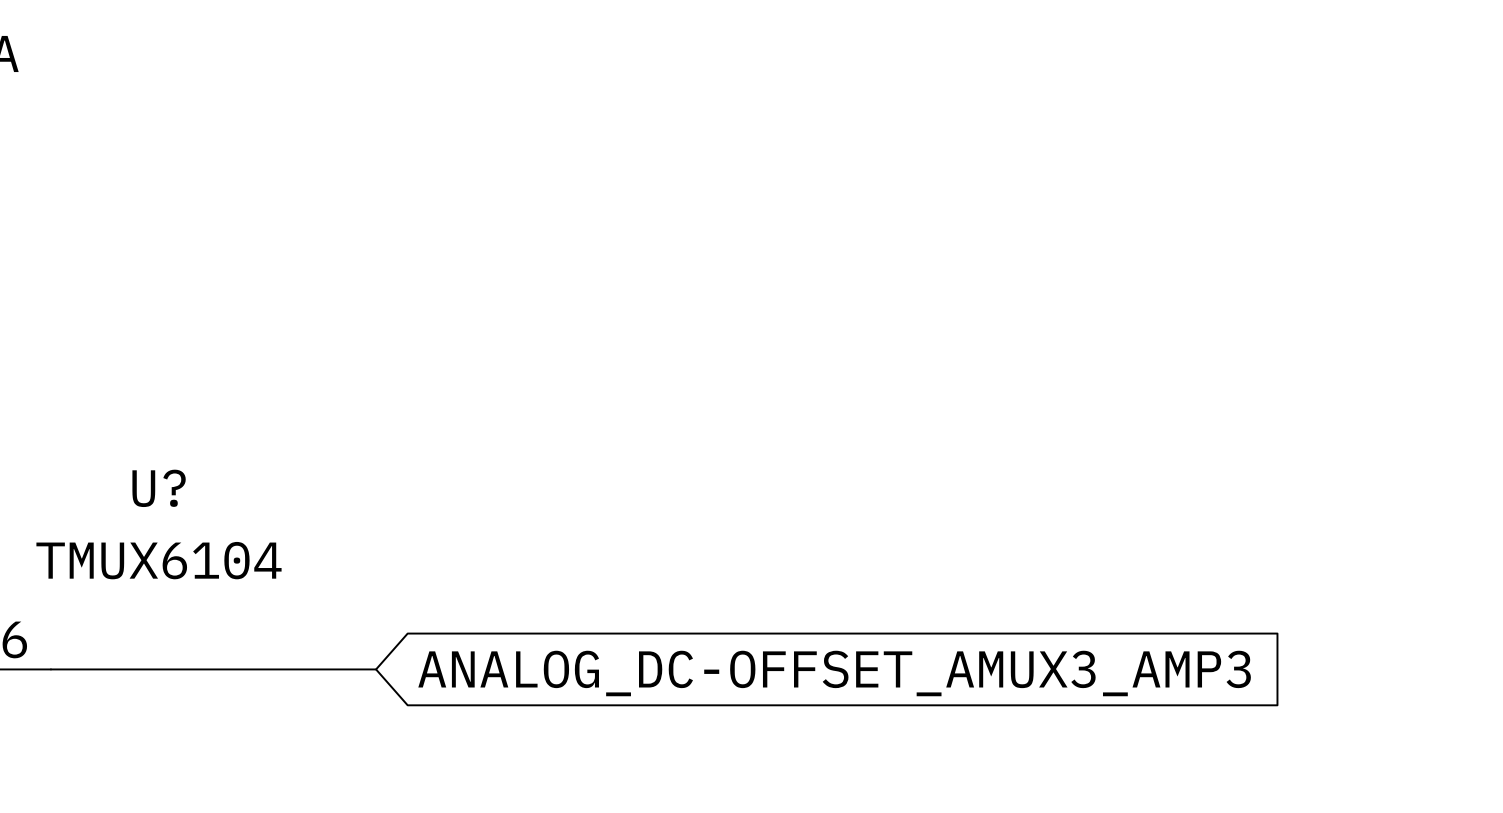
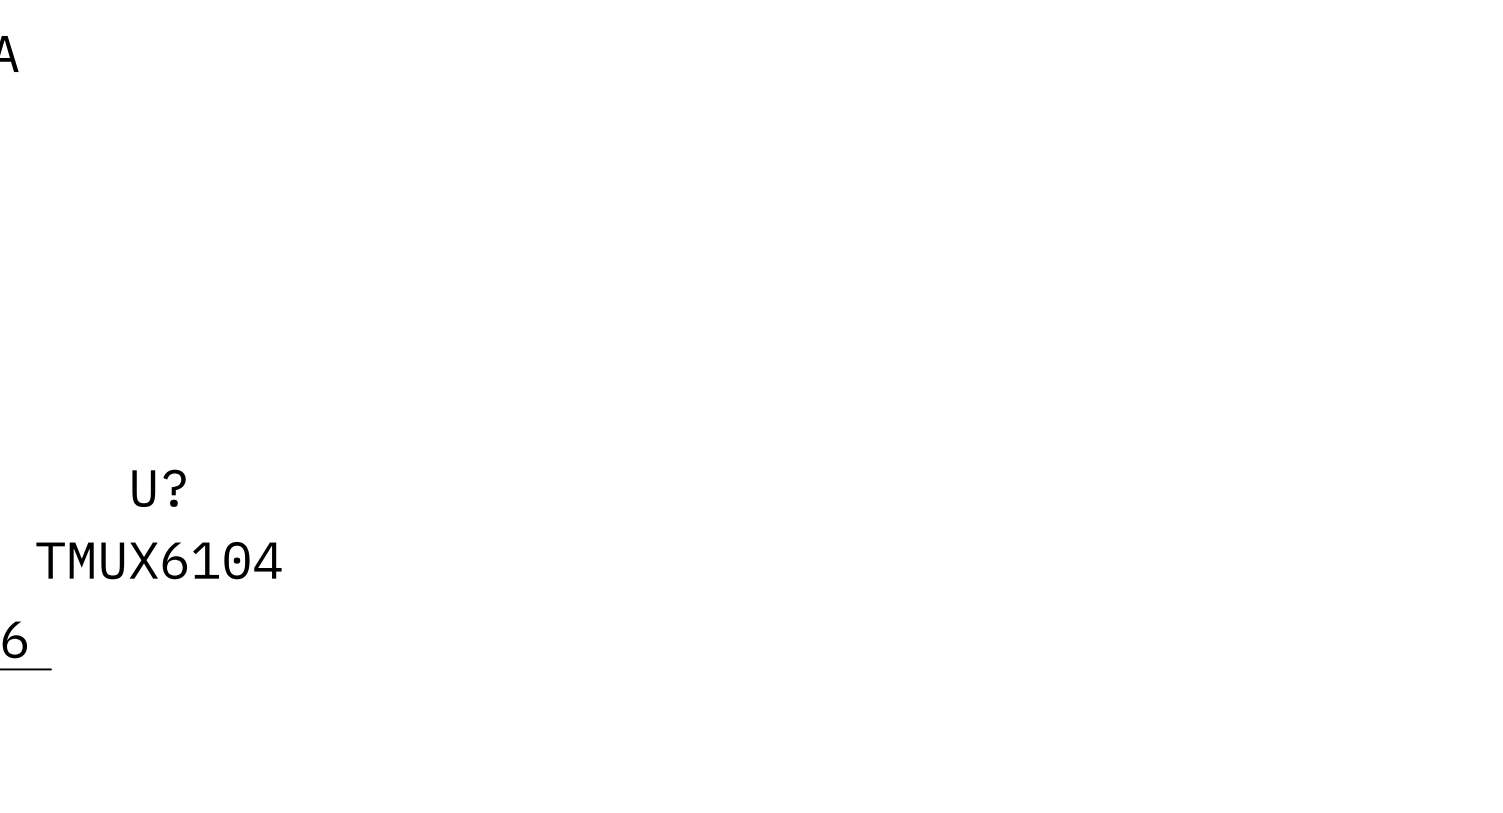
wire: (50, 669) (376, 669) -> none
global label: ANALOG_DC-OFFSET_AMUX3_AMP3 (834, 673) -> none

